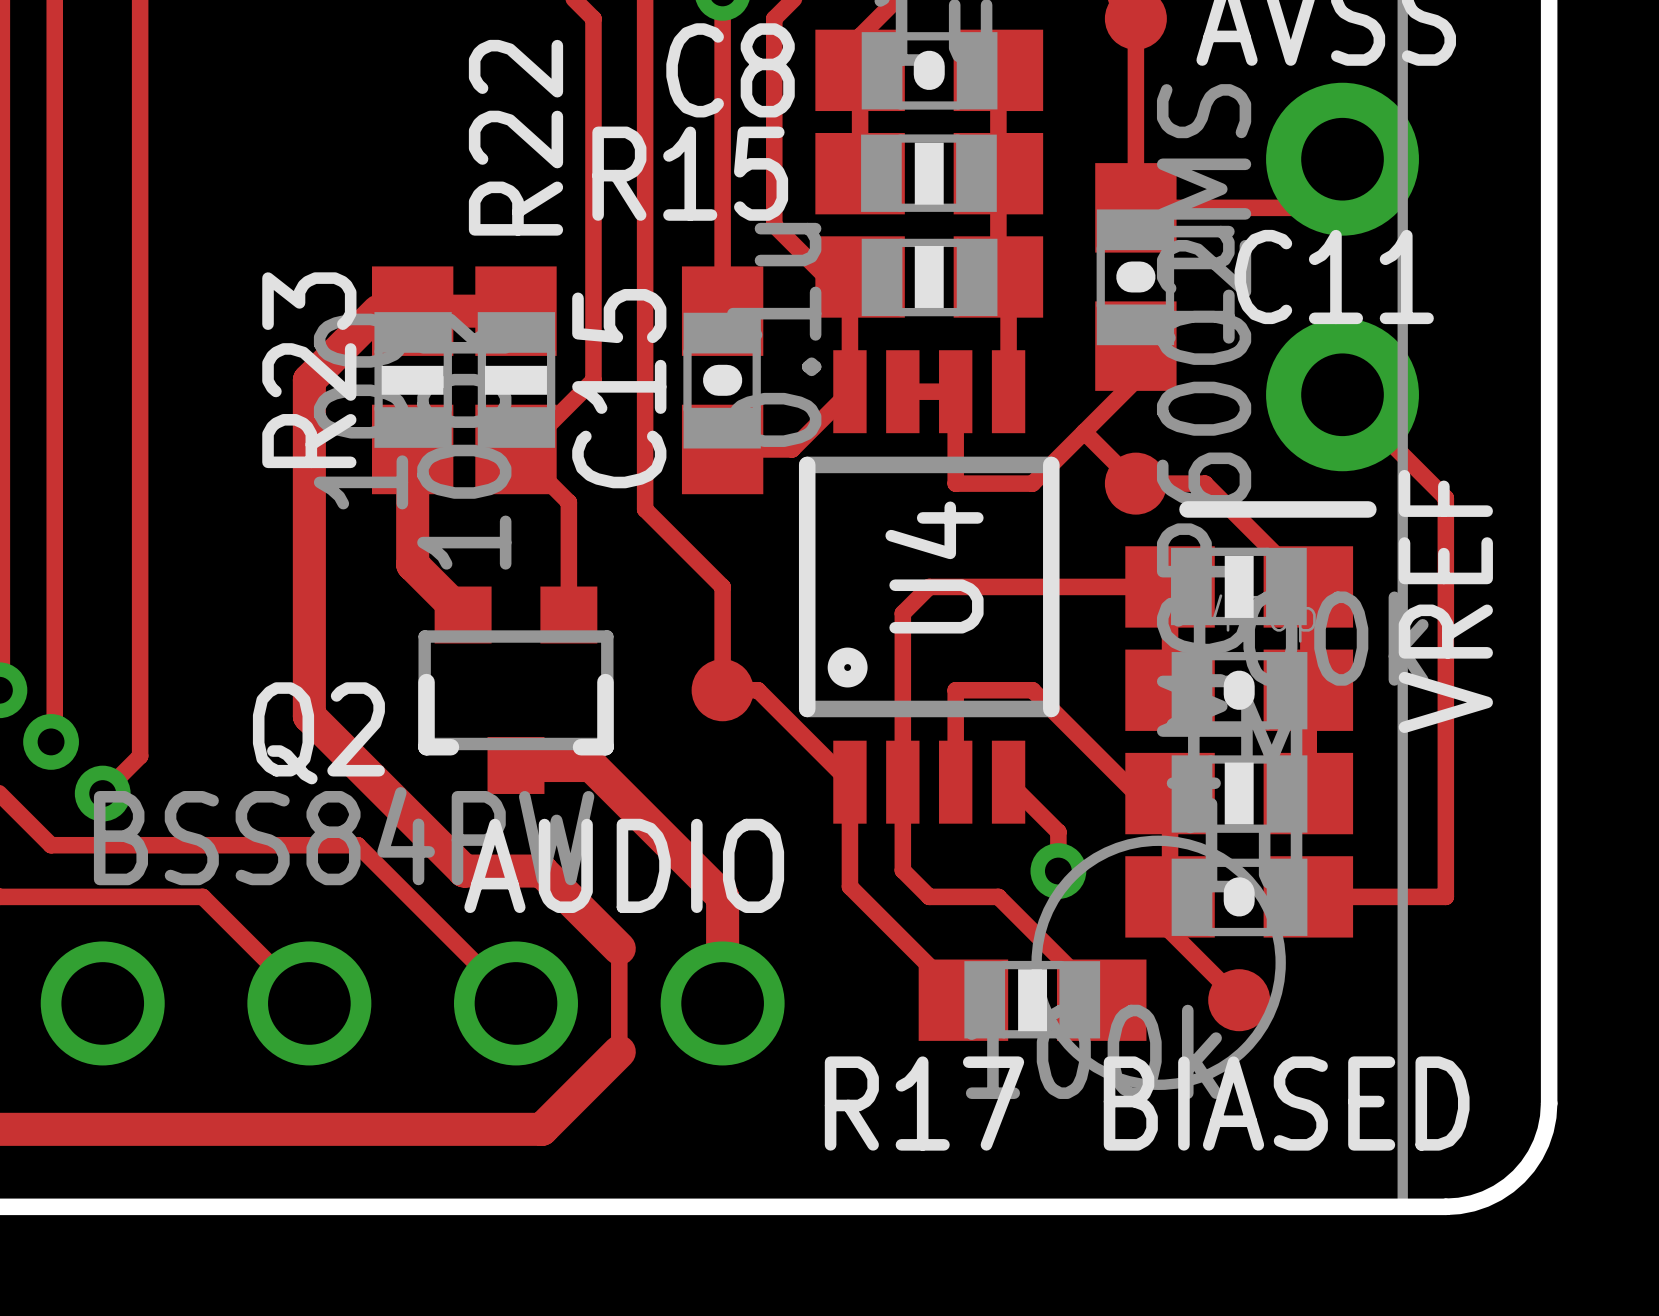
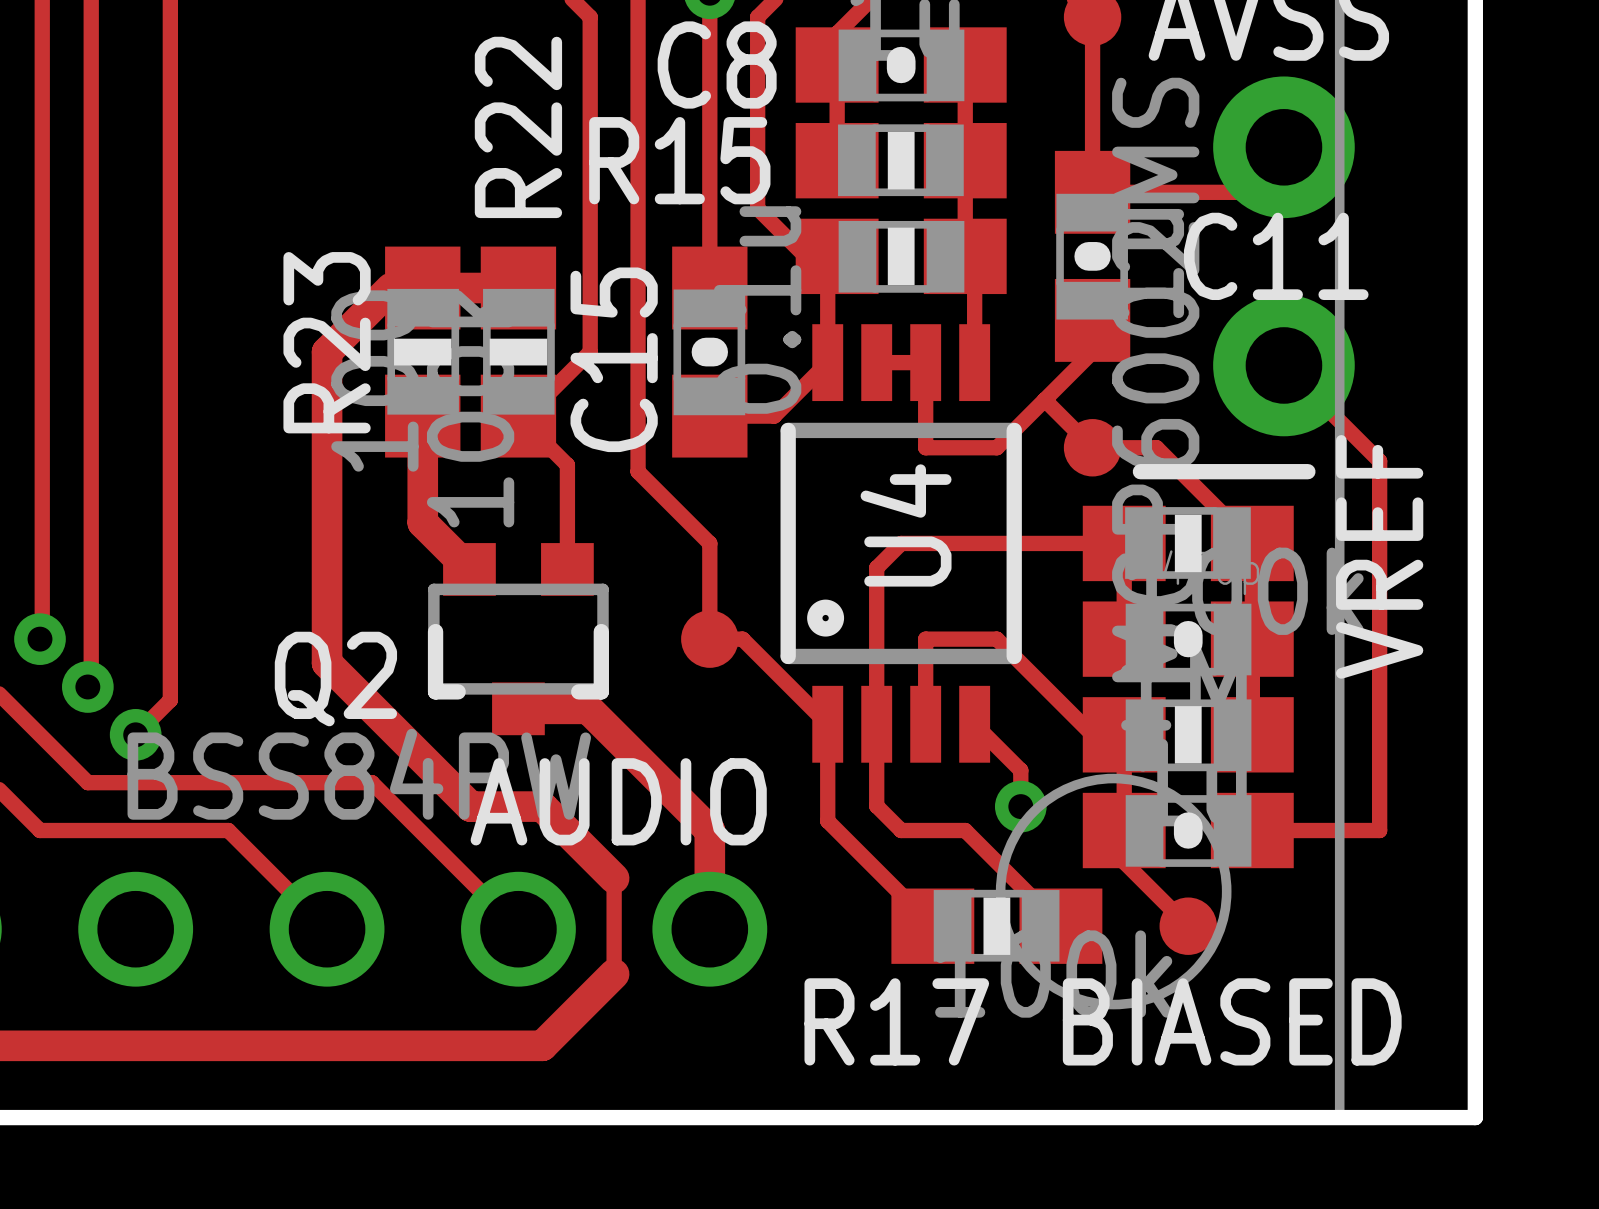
board edge: (1549, 1103) (1545, 1130) (1541, 1143) (1535, 1155) (1518, 1176) (1497, 1192) (1485, 1198) (1472, 1203) (1445, 1206) -> (1475, 1021) (1475, 1117) (1379, 1117)

